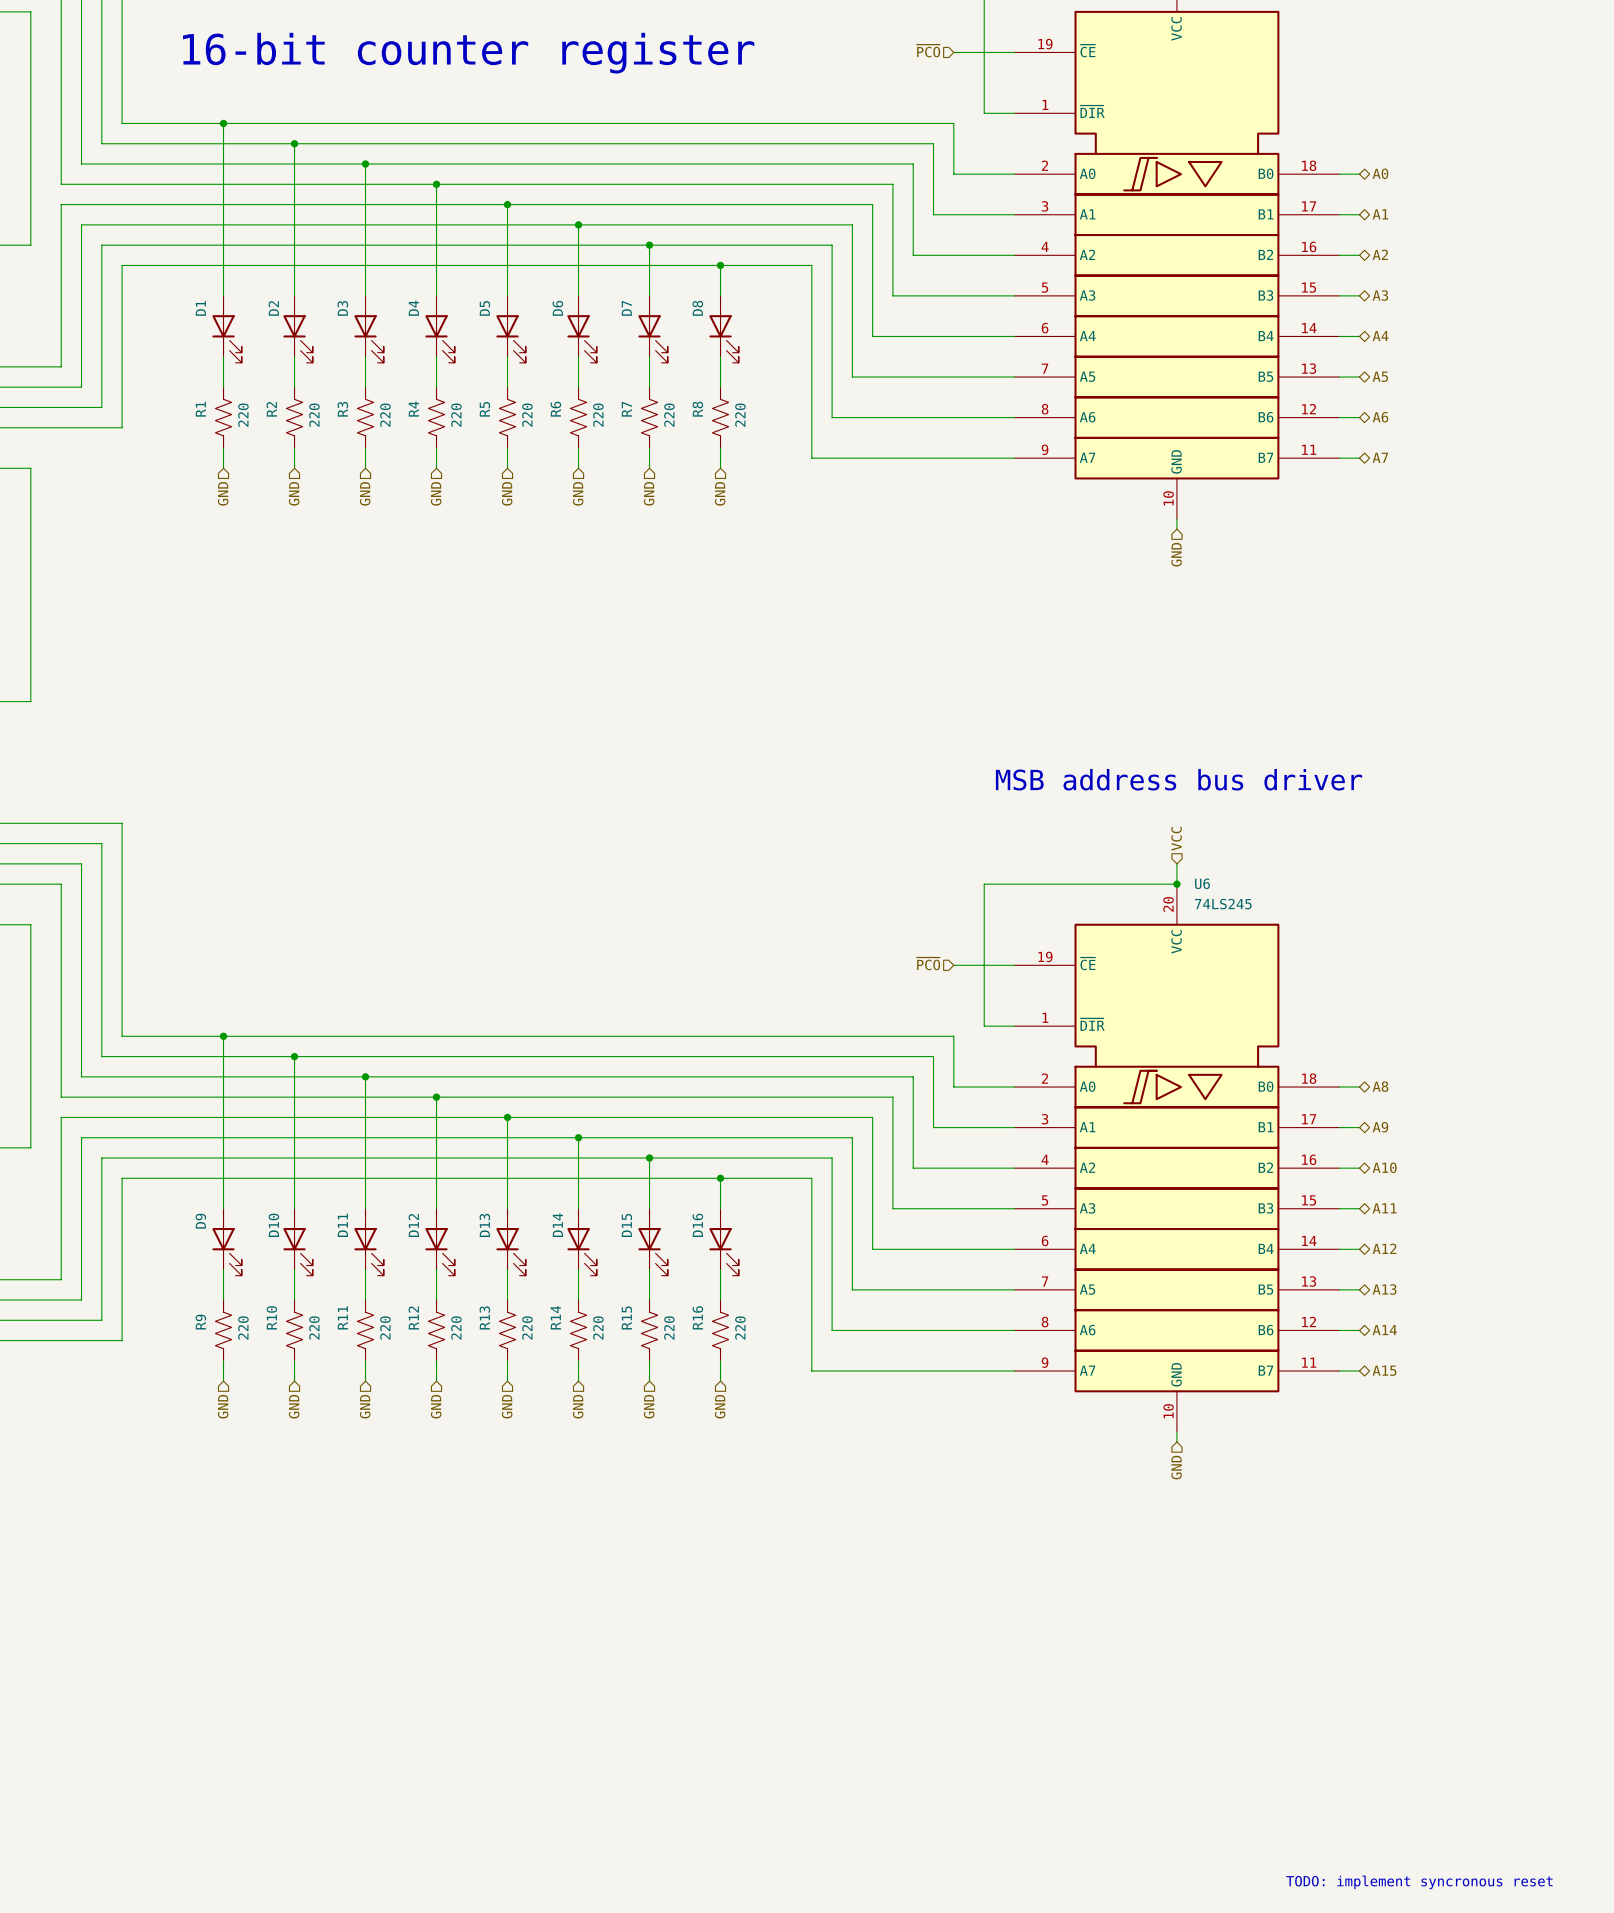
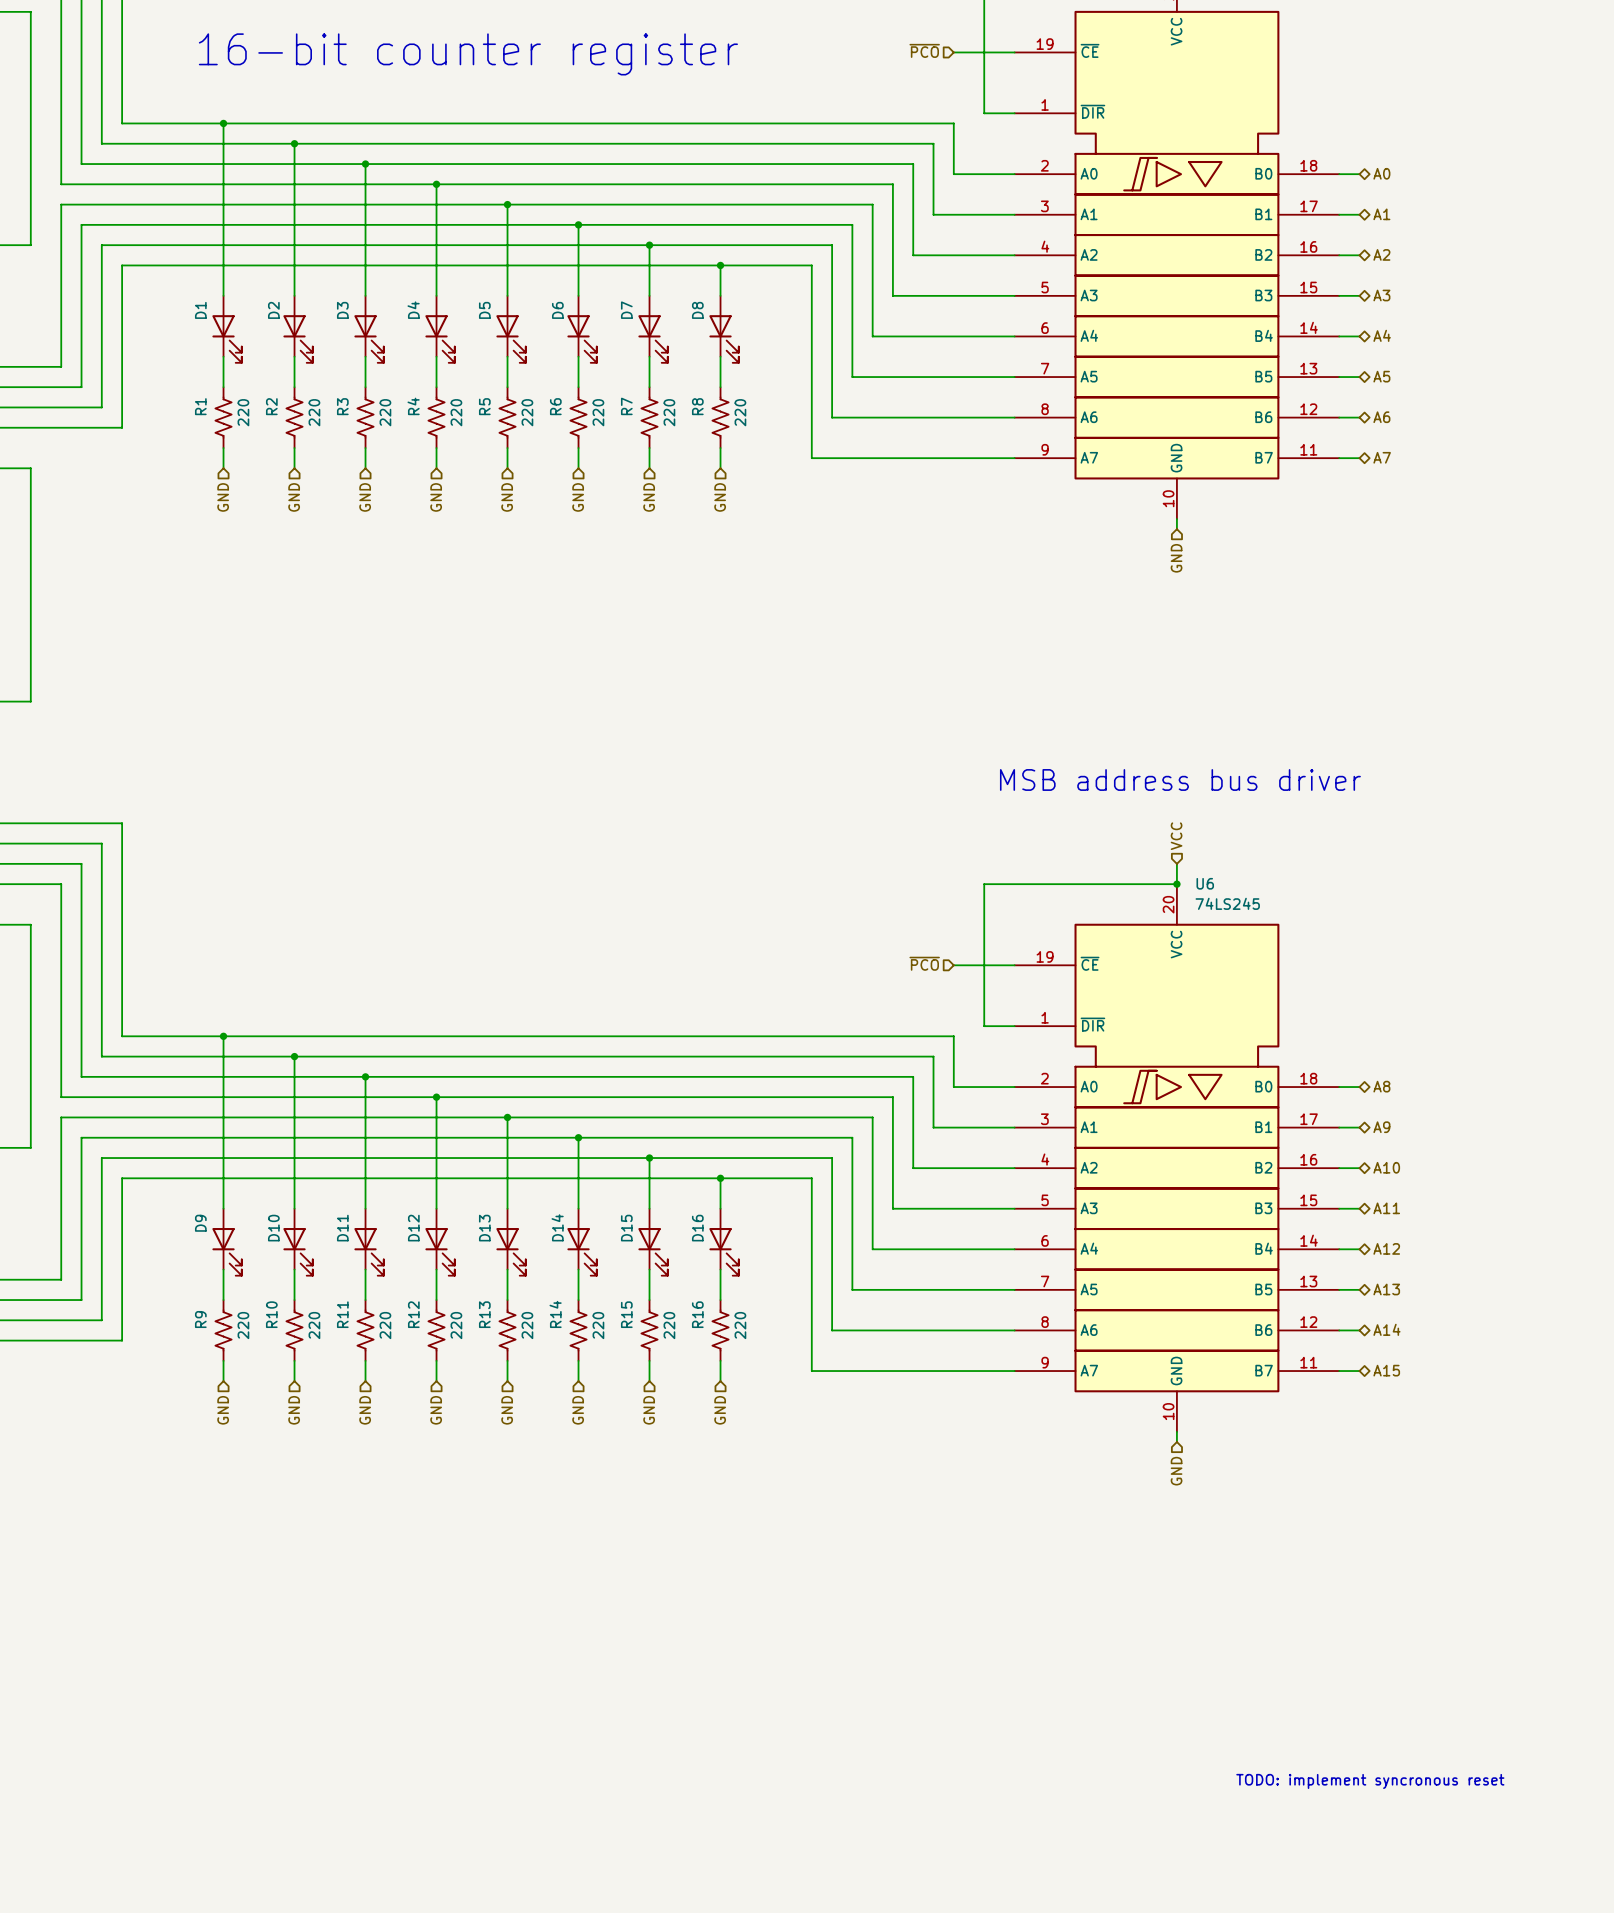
text position: TODO: implement syncronous reset (1419, 1882) -> TODO: implement syncronous reset (1370, 1781)

